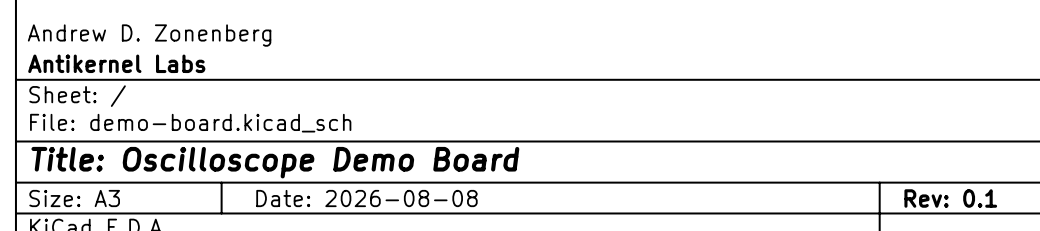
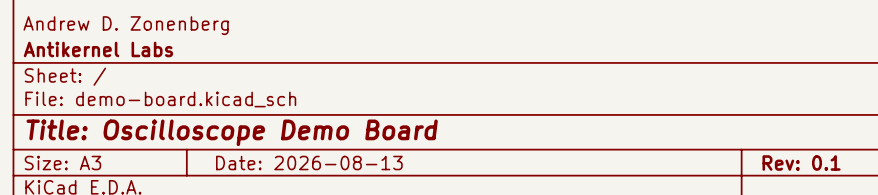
title block: Date: 2026-08-08 (366, 198) -> Date: 2026-08-13 (309, 163)

